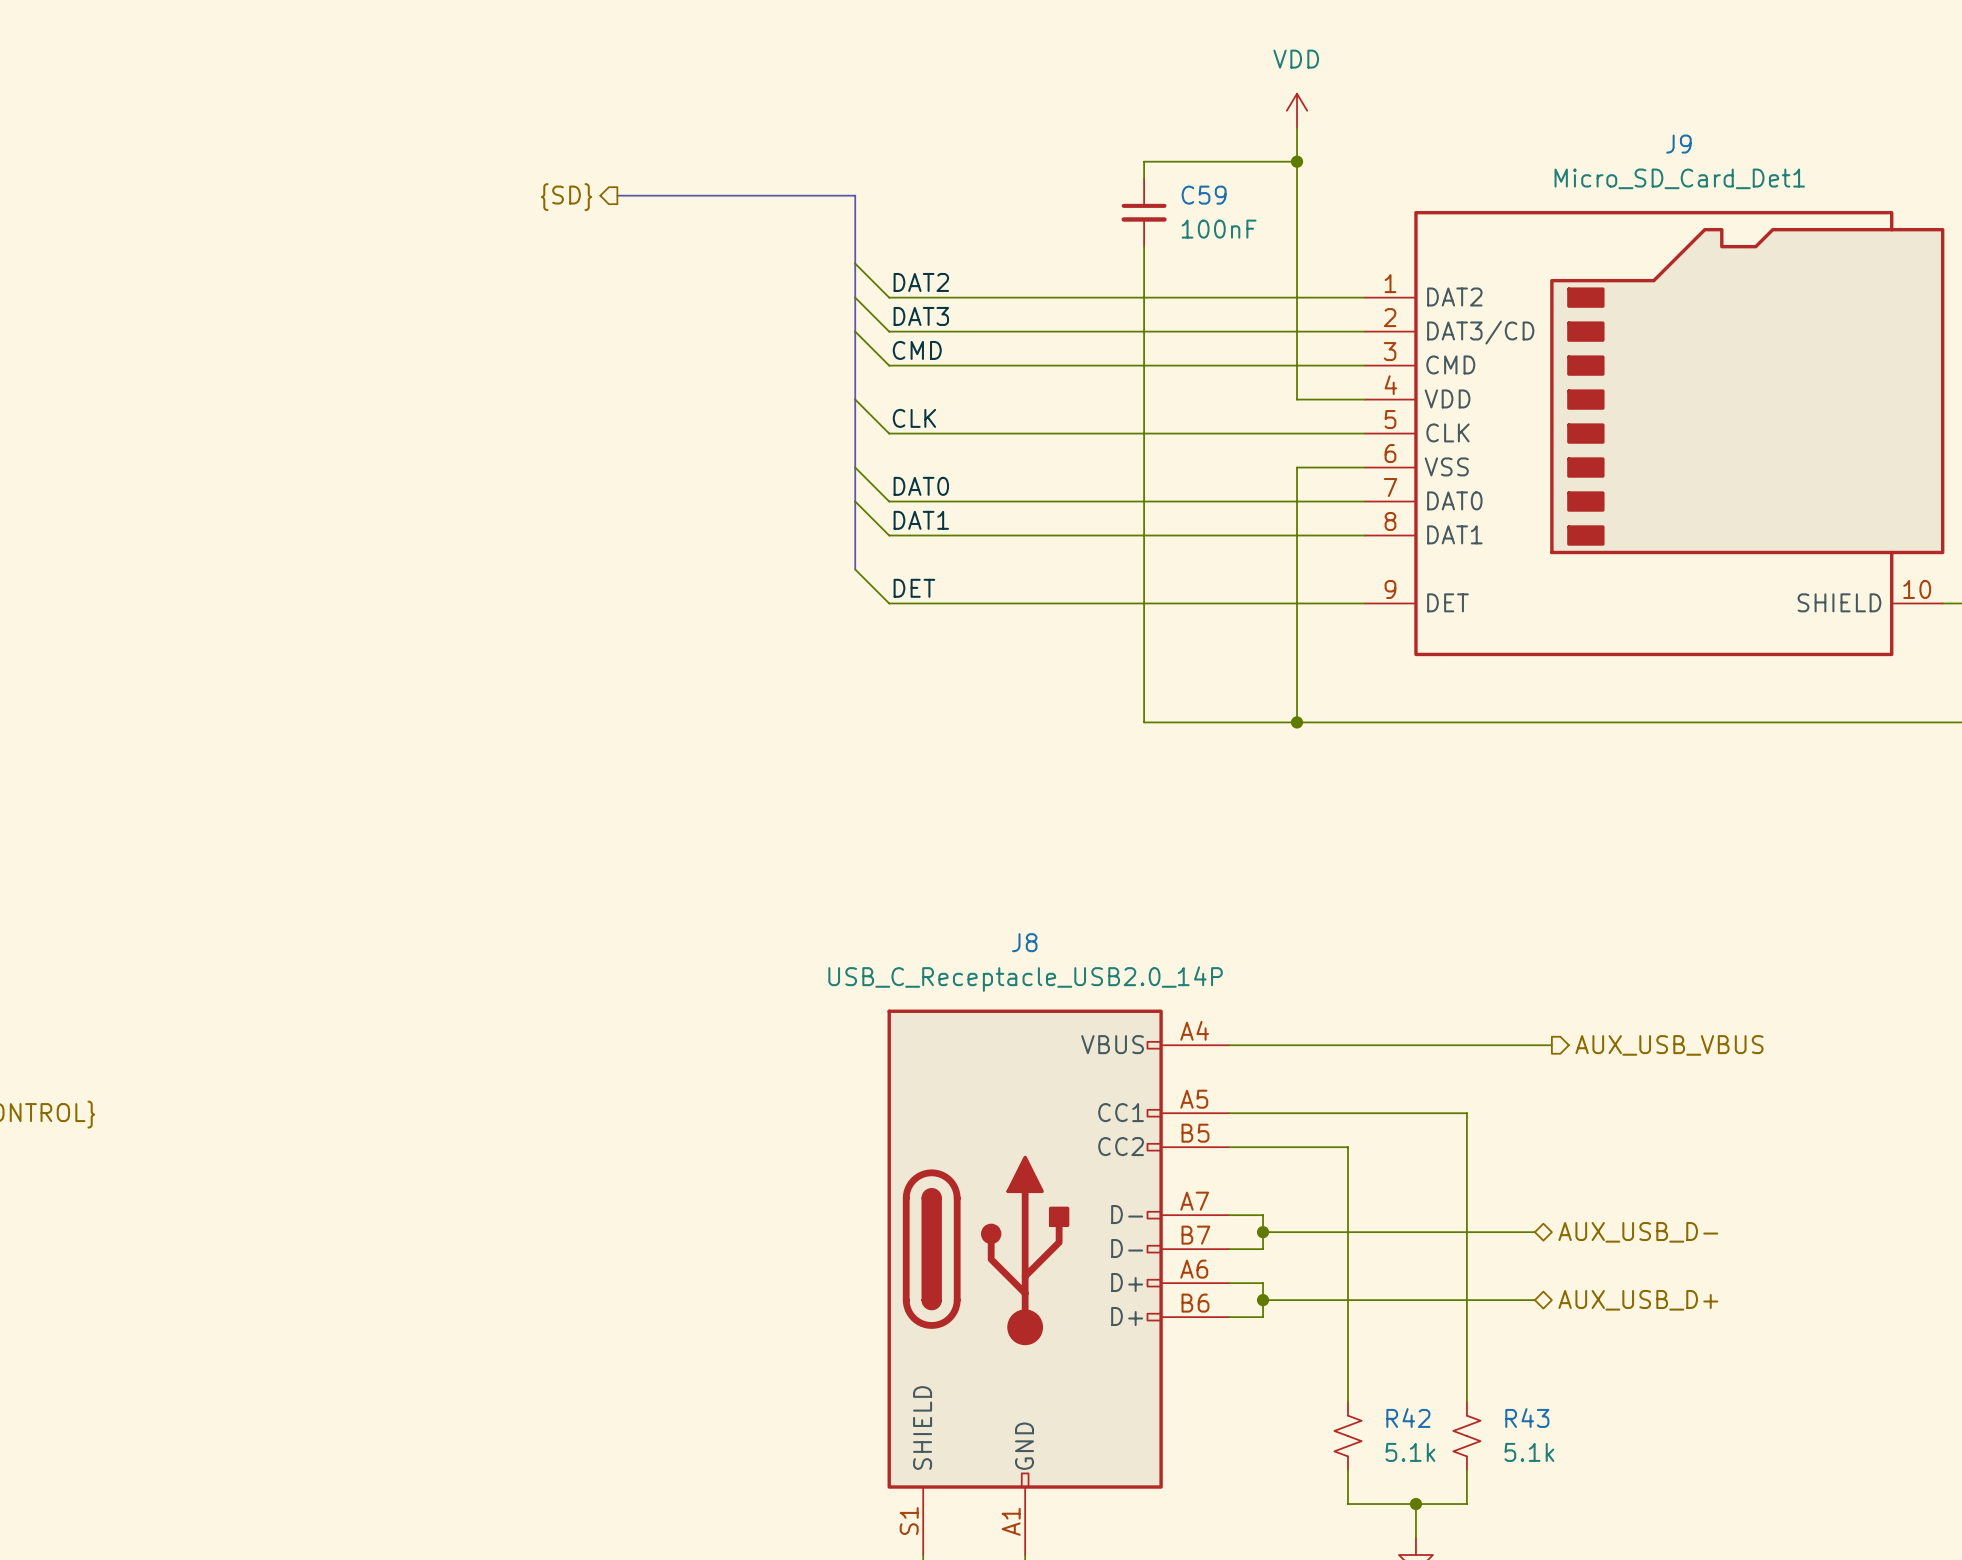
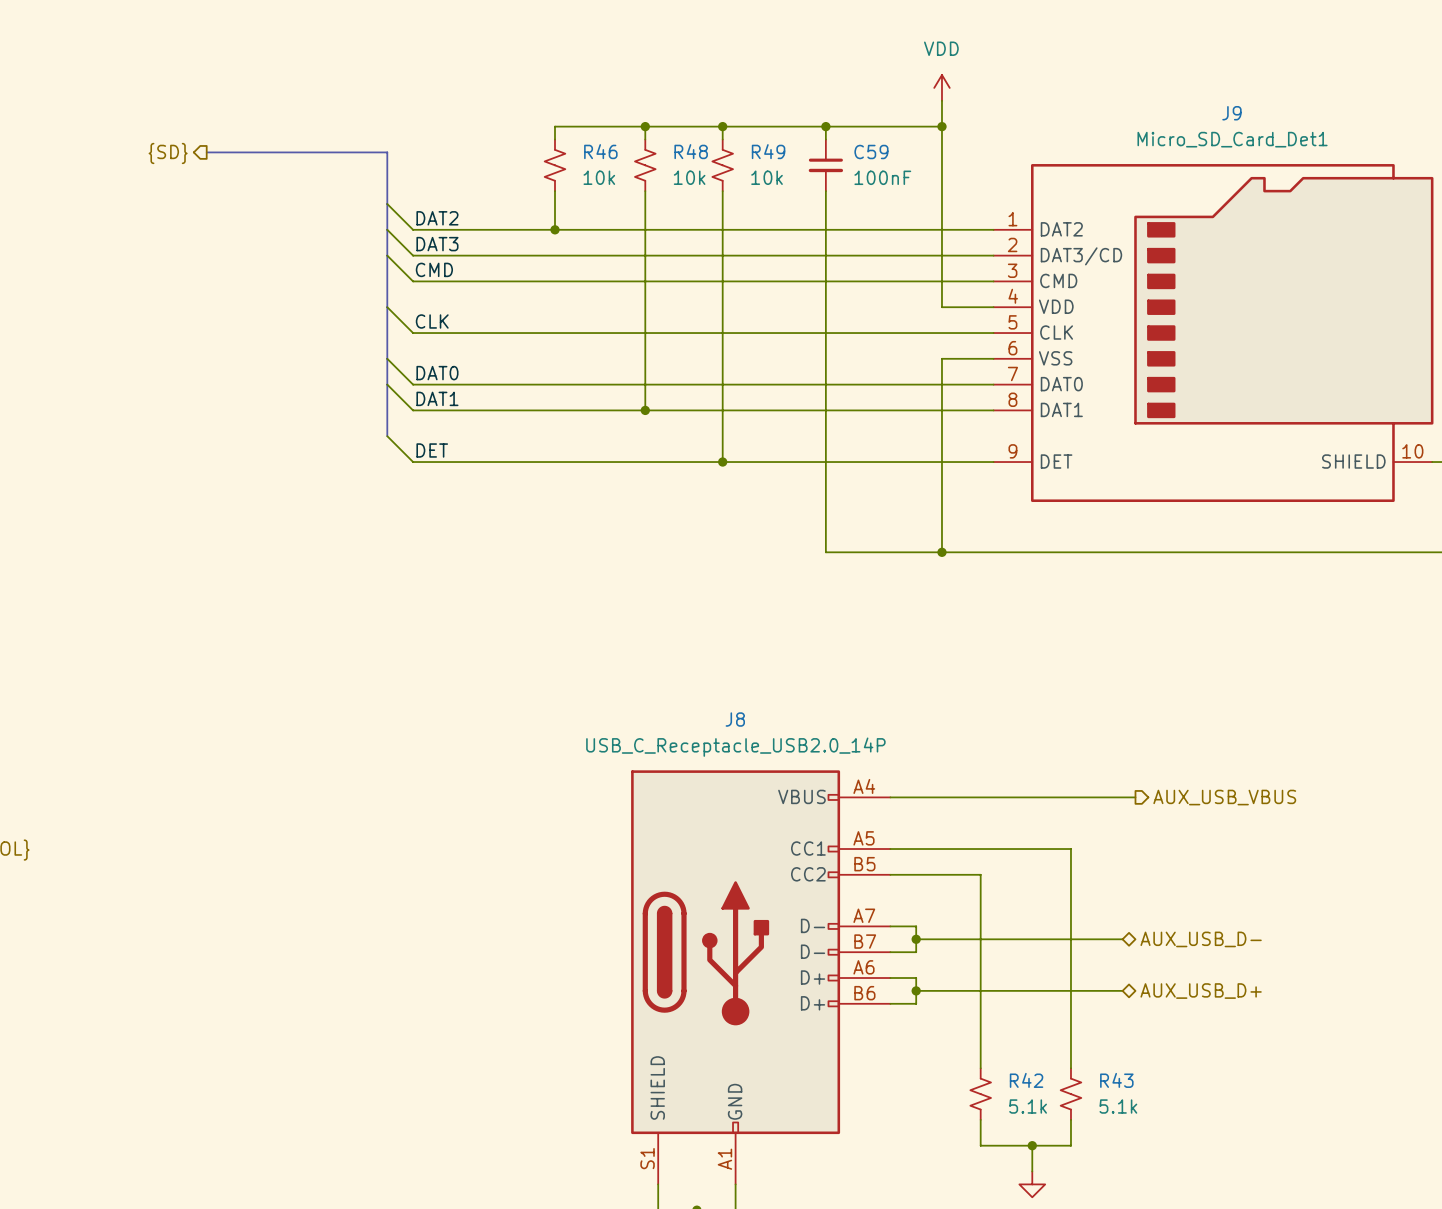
wire: none -> (645, 126) (645, 139)
junction: none -> (645, 126)
wire: none -> (722, 126) (722, 139)
junction: none -> (722, 126)
wire: none -> (825, 126) (555, 126) (555, 139)
junction: none -> (825, 126)
bus: (617, 195) (855, 195) (855, 569) -> (206, 152) (387, 152) (387, 436)
hierarchical label position: {SD} (566, 197) -> {SD} (168, 153)
R46: none -> 10k (555, 165)
R48: none -> 10k (645, 165)
R49: none -> 10k (722, 165)
wire: none -> (555, 191) (555, 229)
wire: none -> (645, 191) (645, 410)
wire: none -> (722, 191) (722, 462)
wire: (855, 263) (889, 297) -> (387, 204) (413, 229) (632, 229)
label position: DAT2 (921, 282) -> DAT2 (437, 218)
junction: none -> (555, 229)
wire: (855, 297) (889, 331) -> (387, 229) (413, 255) (632, 255)
label position: DAT3 (921, 316) -> DAT3 (437, 244)
wire: (855, 331) (889, 365) -> (387, 255) (413, 281) (632, 281)
label position: CMD (917, 350) -> CMD (434, 269)
wire: (855, 399) (889, 433) -> (387, 307) (413, 333) (632, 333)
label position: CLK (914, 418) -> CLK (432, 321)
wire: (855, 467) (889, 501) -> (387, 358) (413, 384) (632, 384)
label position: DAT0 (921, 486) -> DAT0 (437, 373)
wire: (855, 501) (889, 535) -> (387, 384) (413, 410) (632, 410)
label position: DAT1 (921, 520) -> DAT1 (437, 398)
junction: none -> (645, 410)
wire: (855, 569) (889, 603) -> (387, 436) (413, 462) (632, 462)
label position: DET (914, 588) -> DET (432, 450)
junction: none -> (722, 462)

